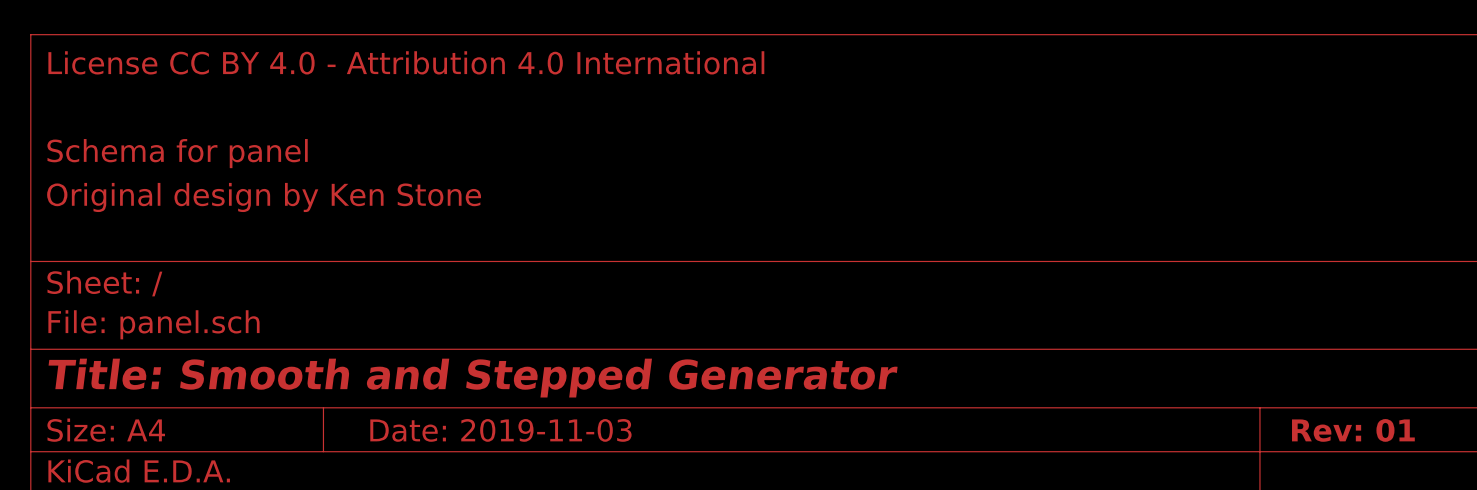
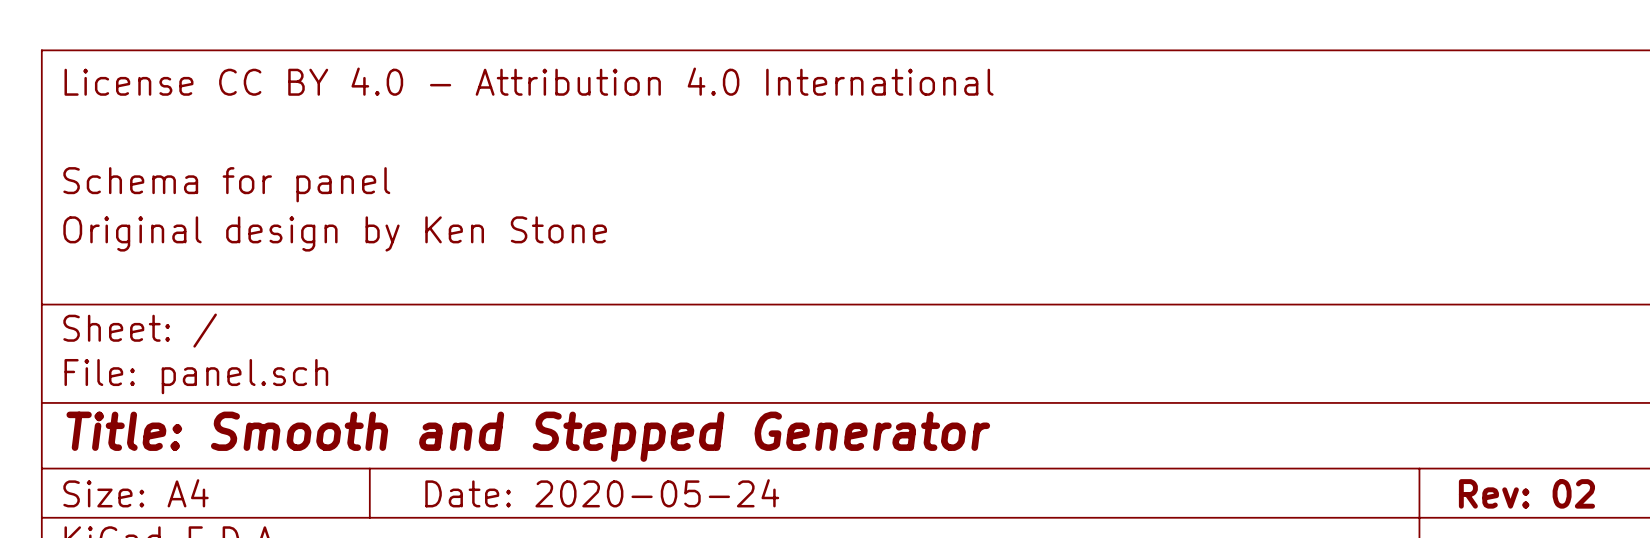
title block: Date: 2019-11-03 (500, 430) -> Date: 2020-05-24 (602, 493)
title block: Rev: 01 (1353, 430) -> Rev: 02 (1526, 493)

